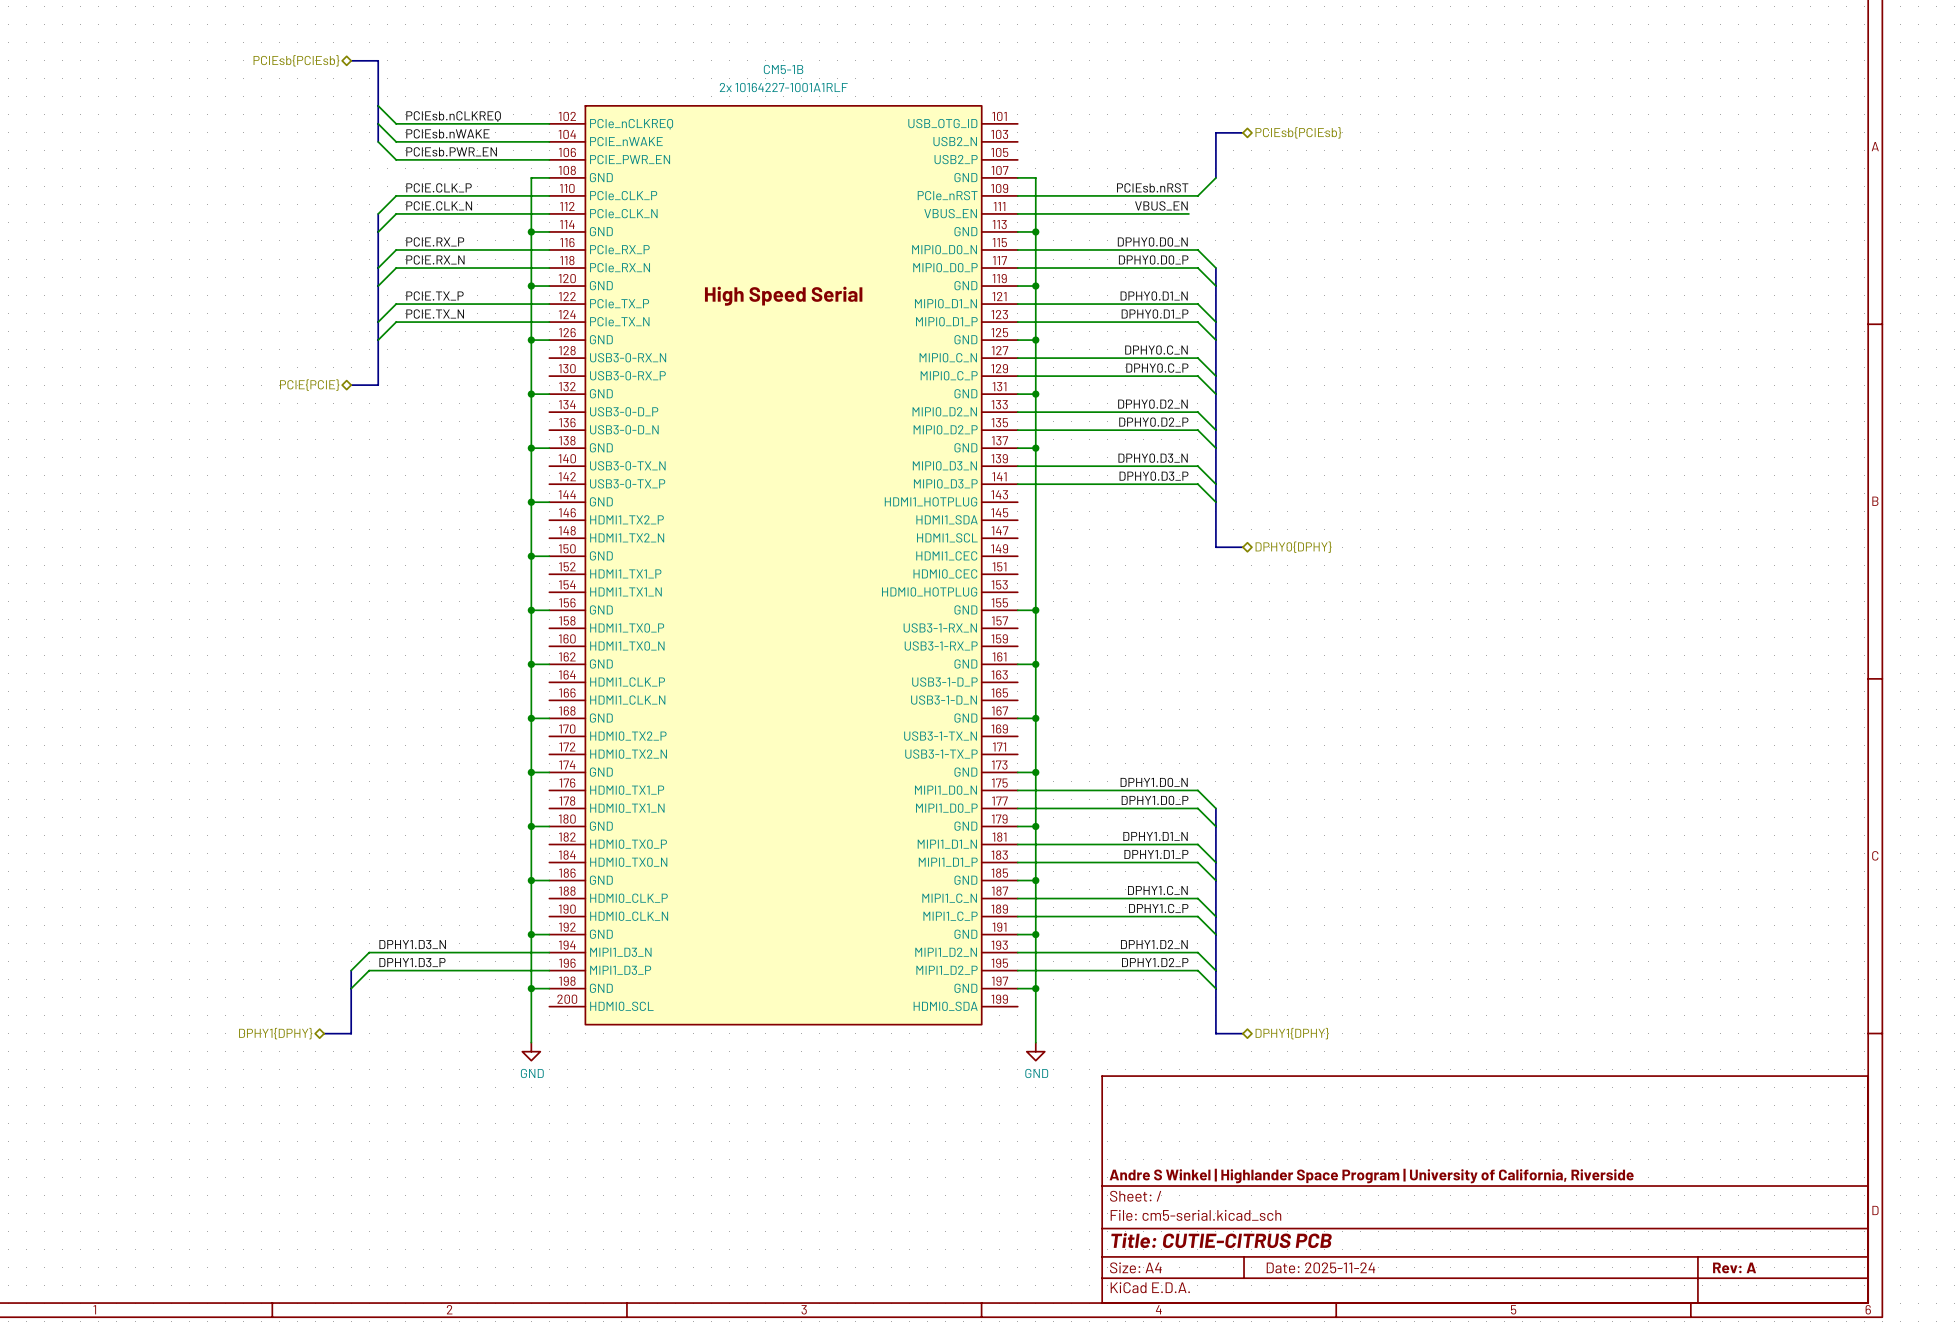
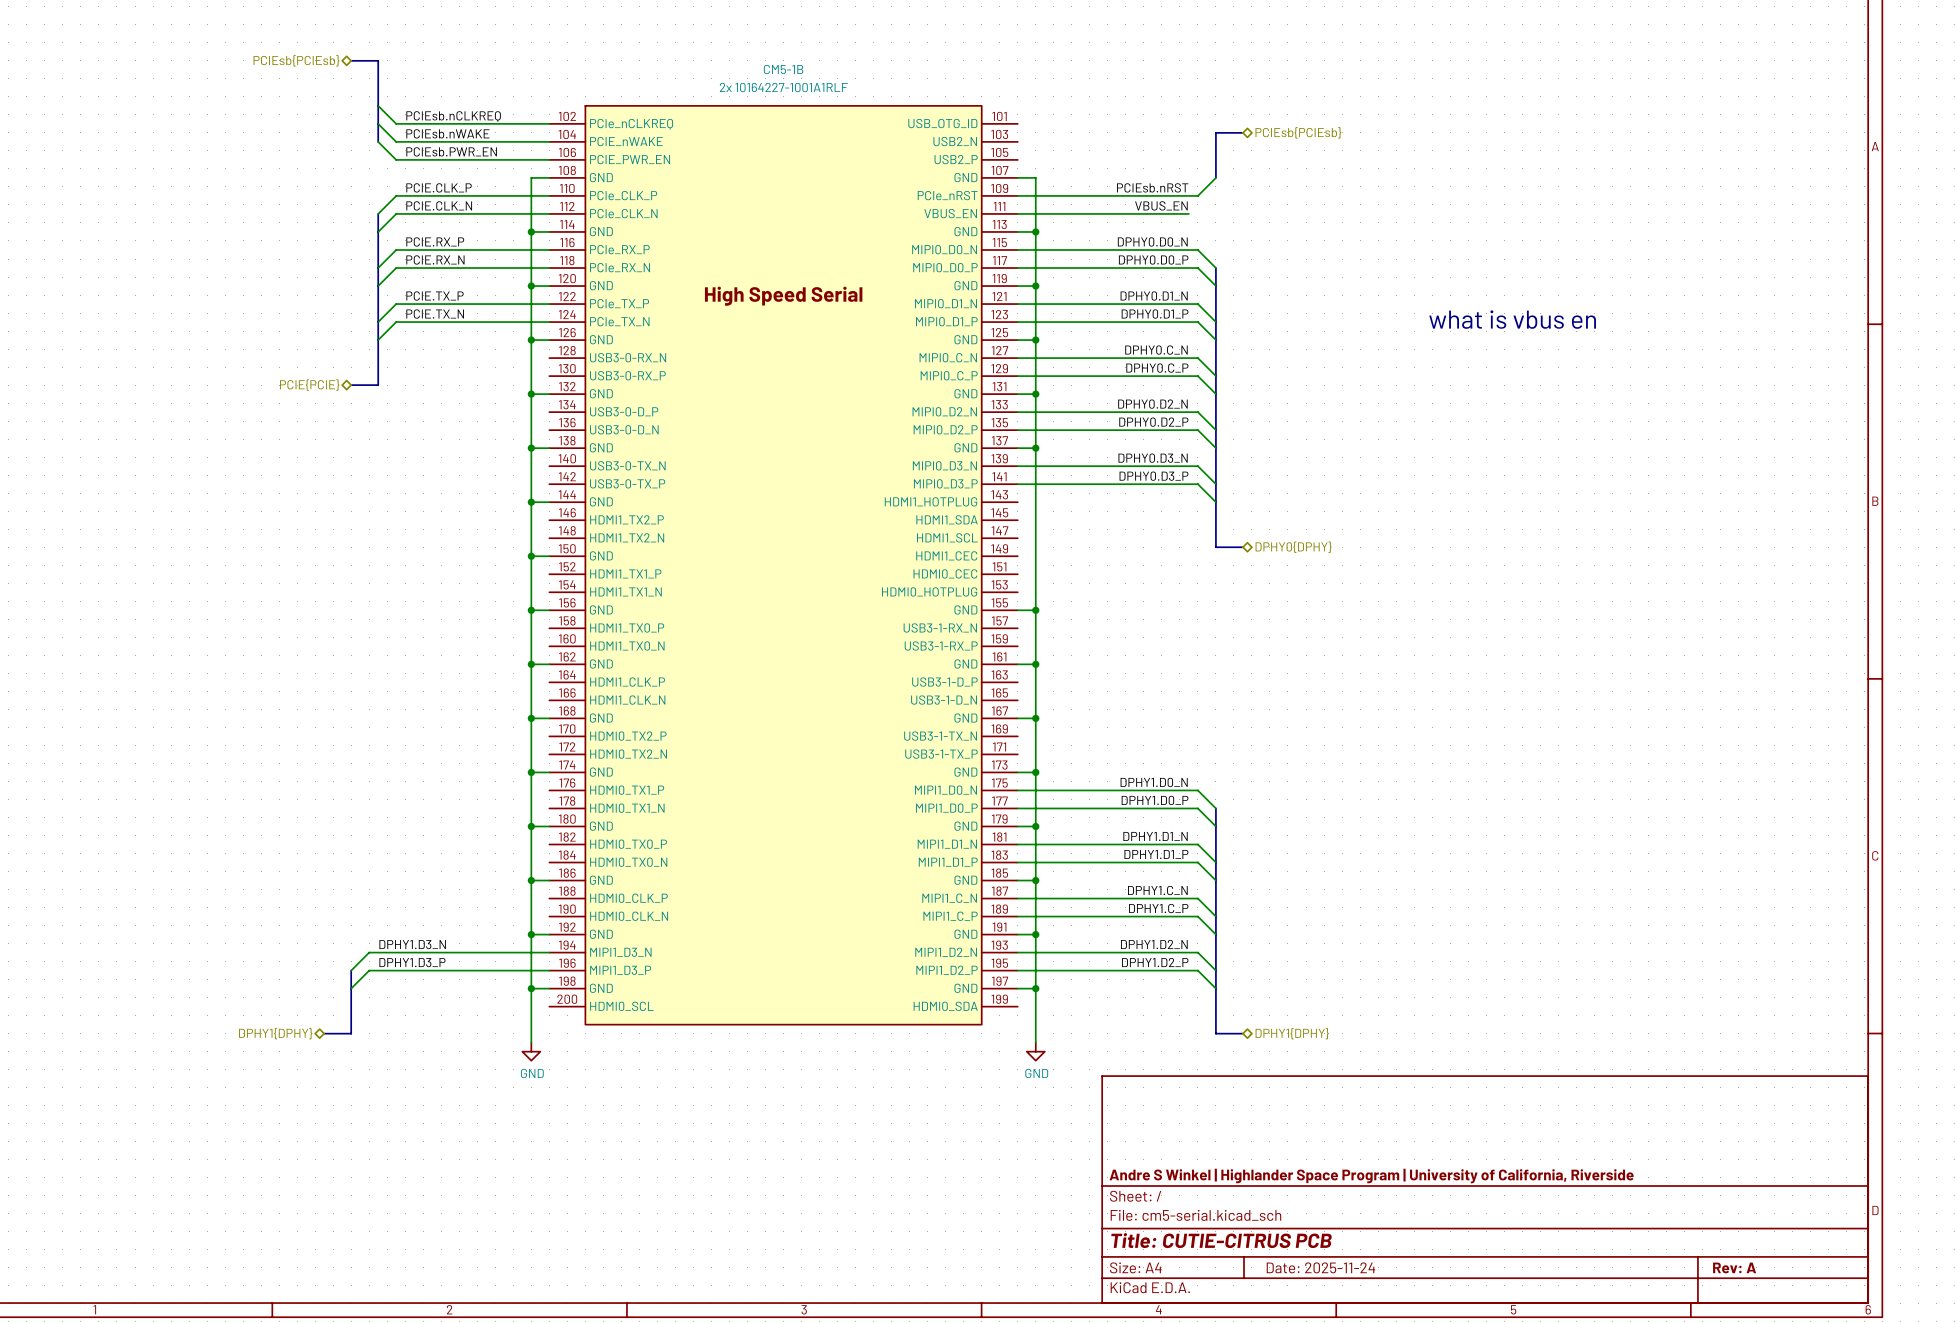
text: none -> what is vbus en (1512, 319)

